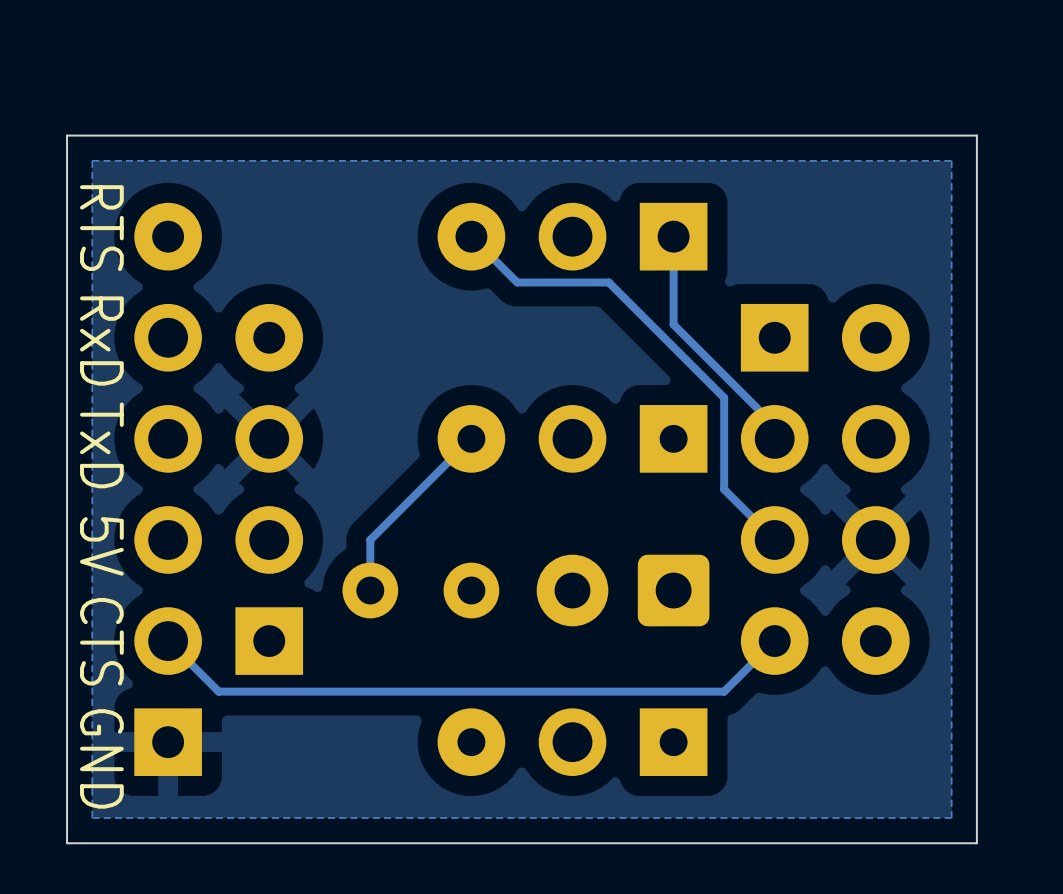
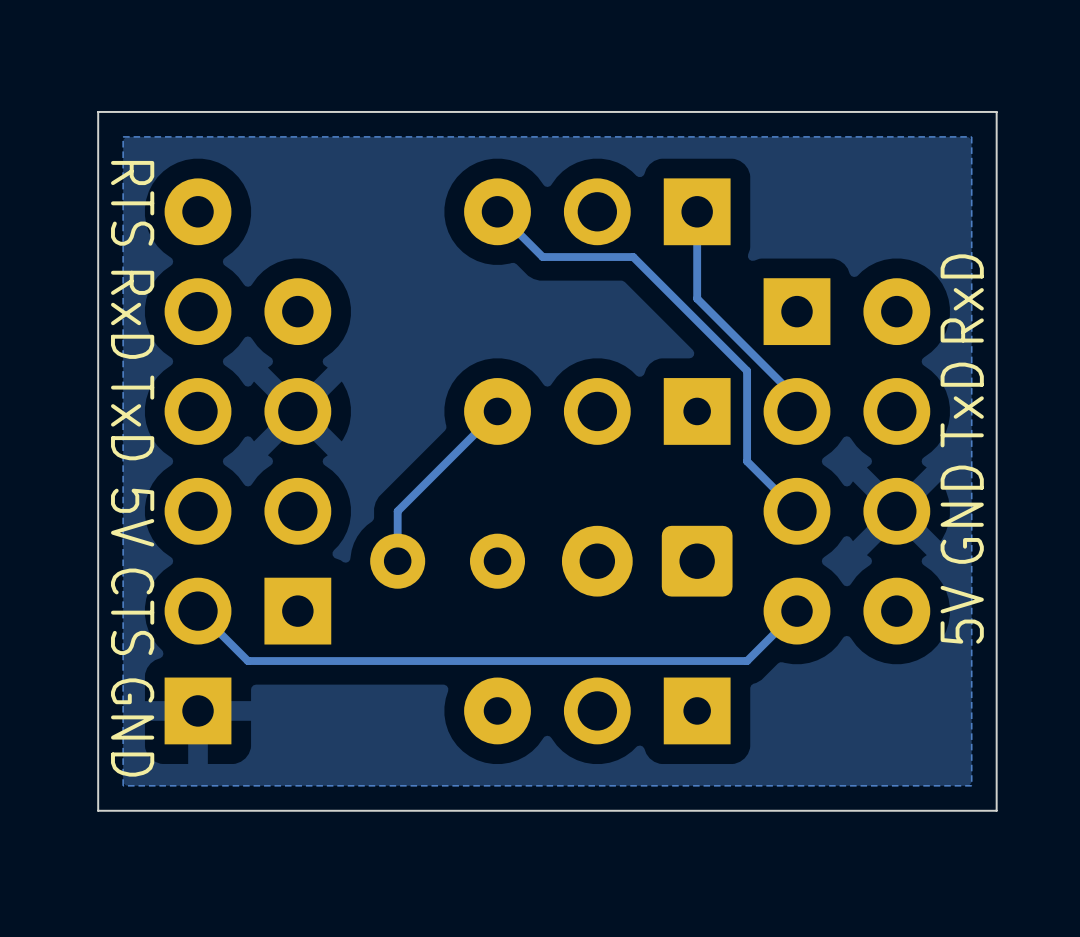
text: none -> RxD (962, 298)
text: none -> TxD (962, 405)
text: none -> GND (962, 514)
text: none -> 5V (962, 614)

